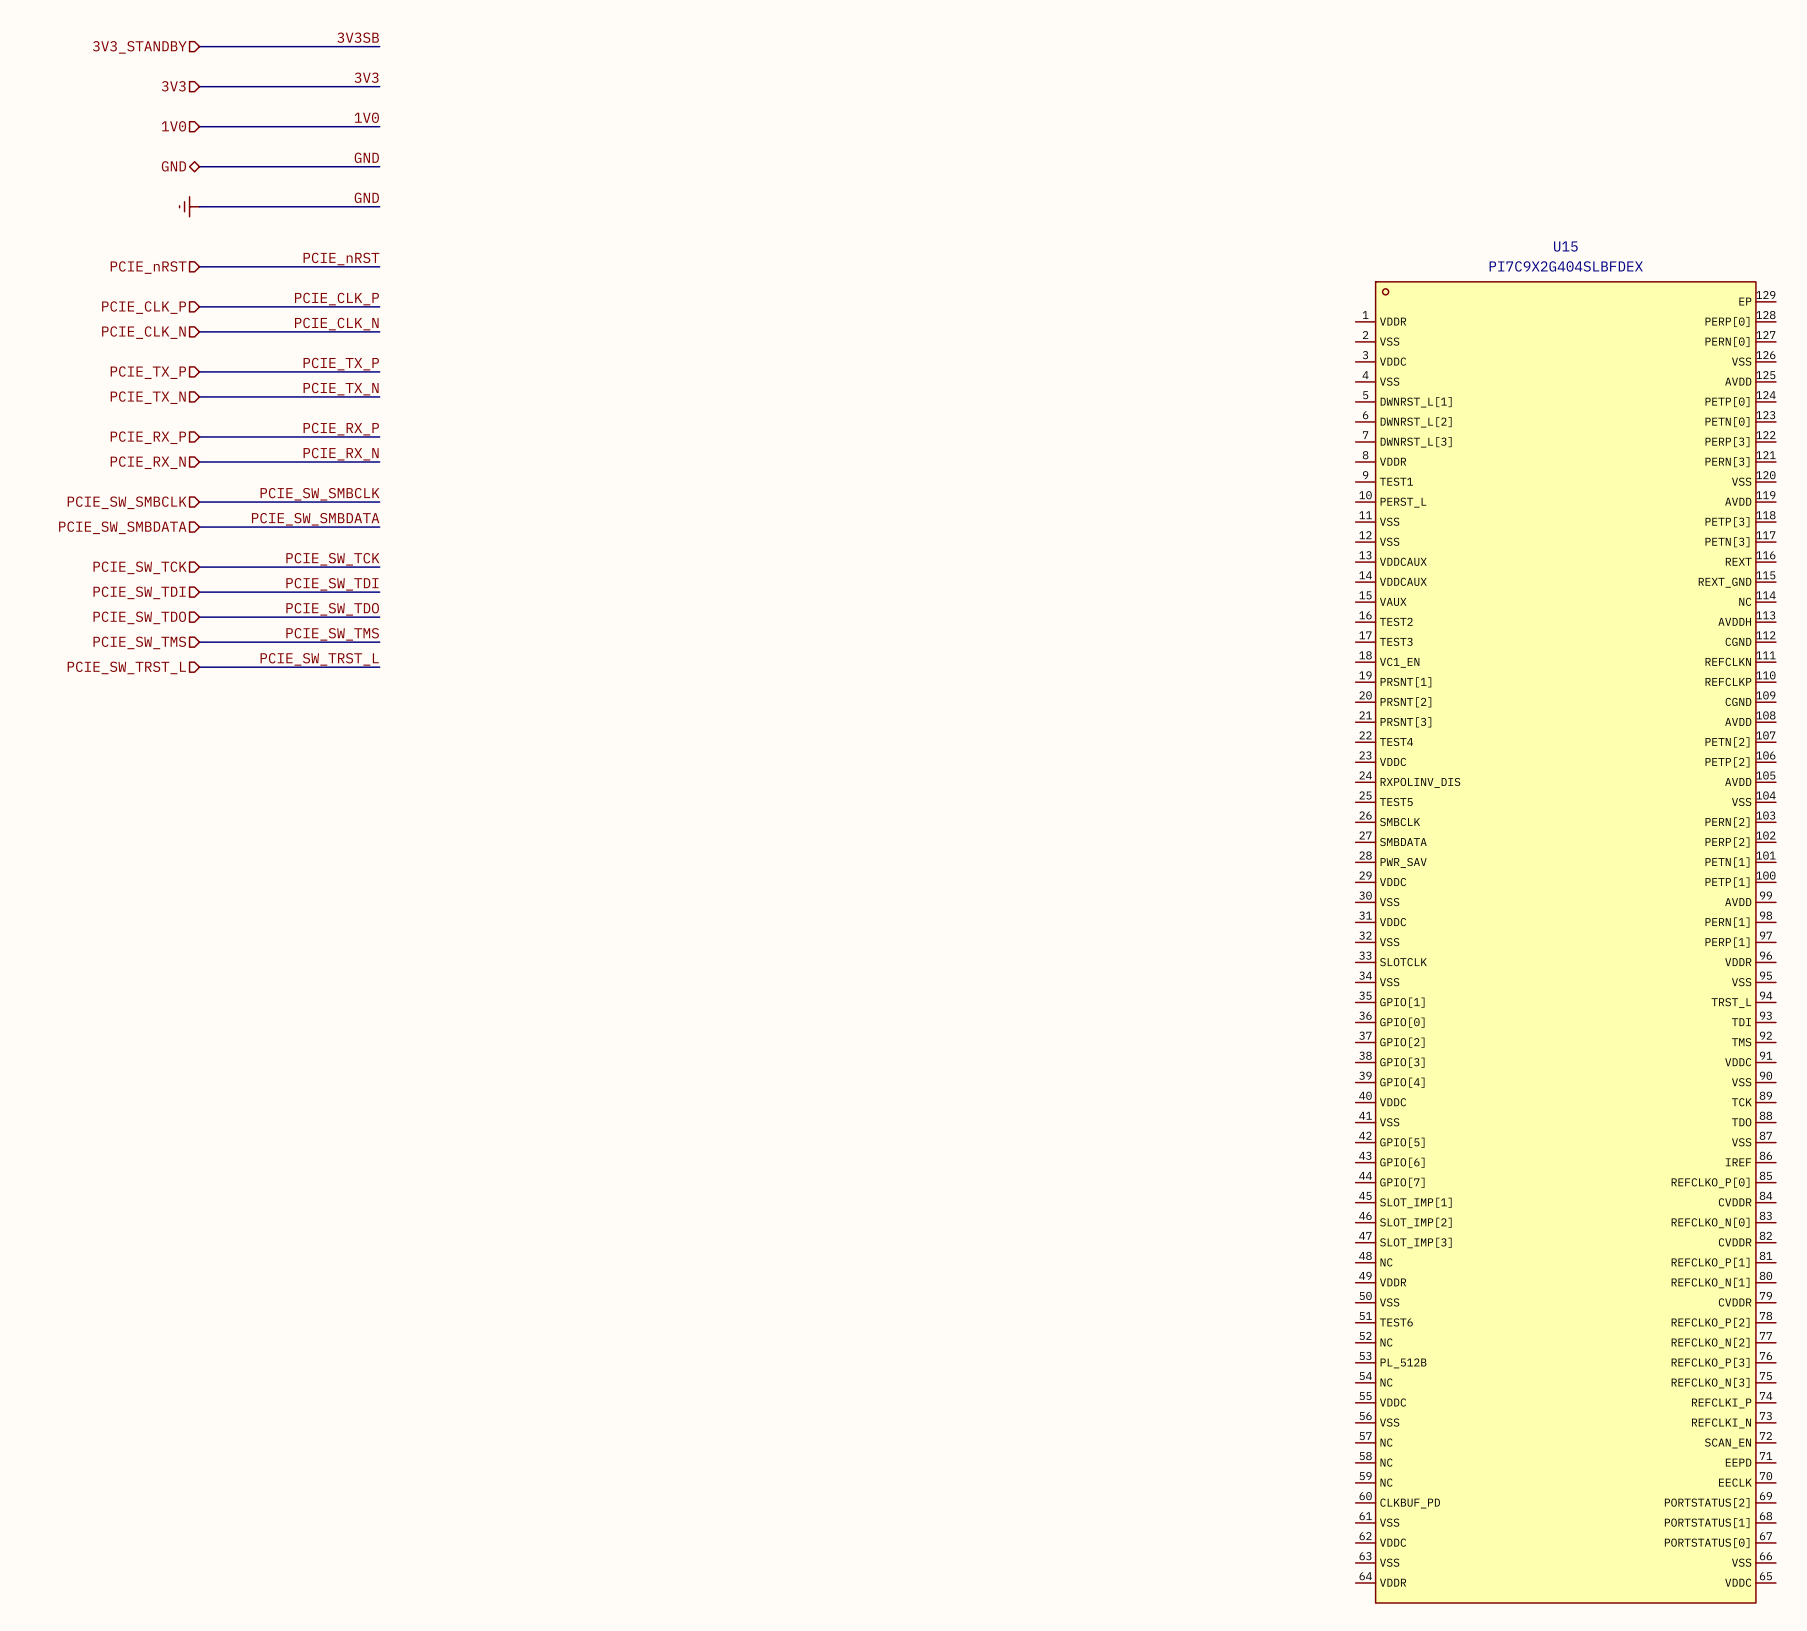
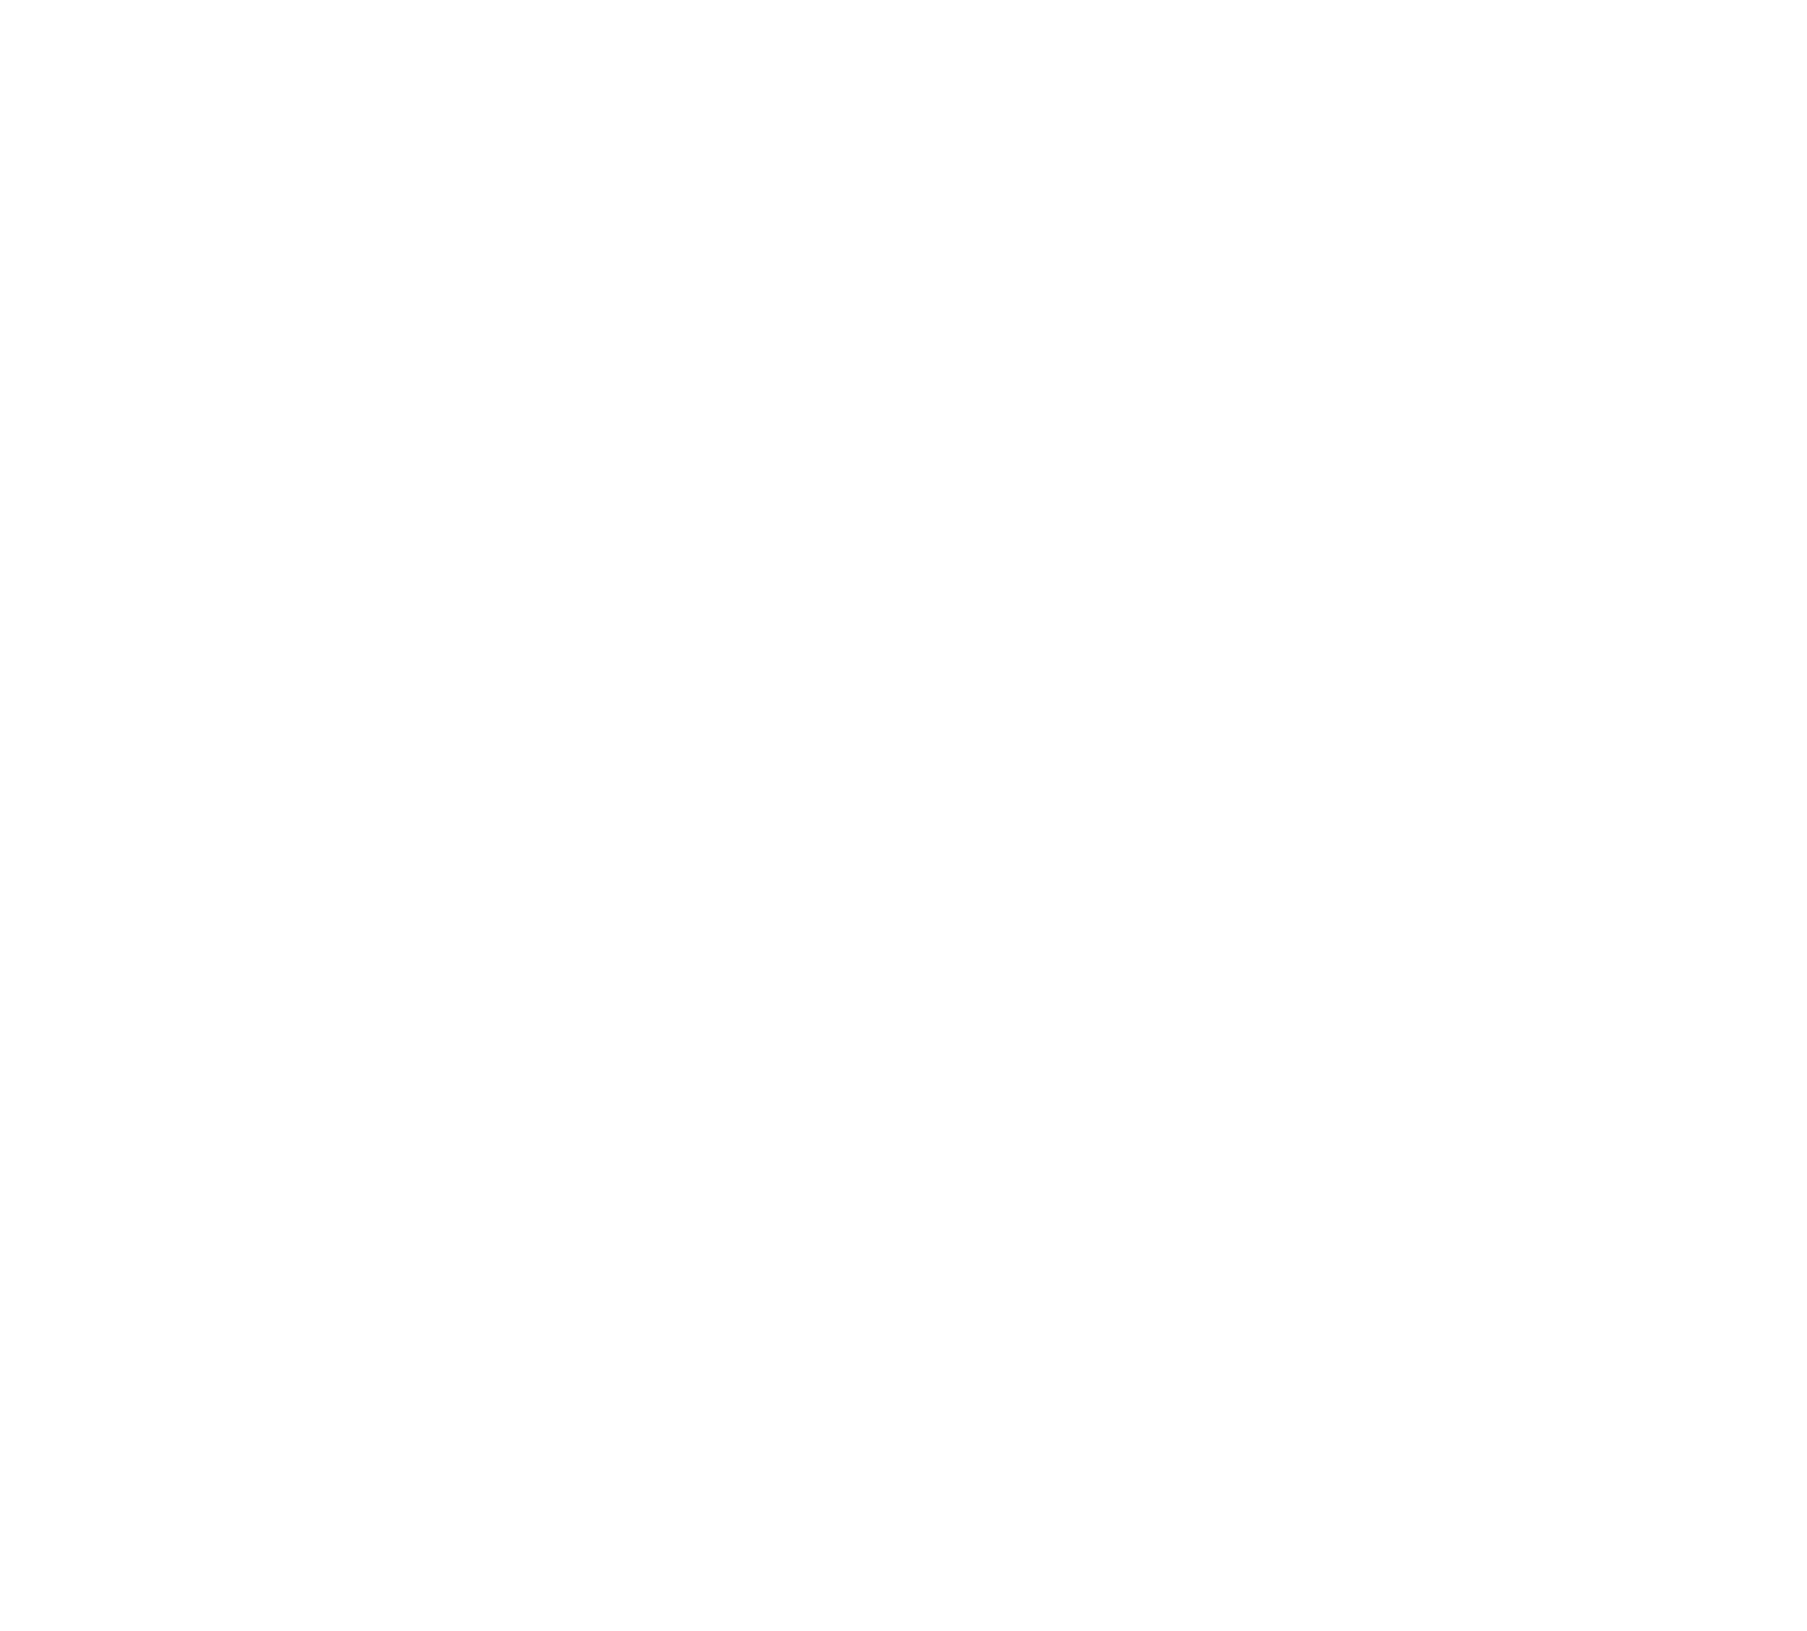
label: 3V3SB (358, 37) -> none
wire: (199, 46) (379, 46) -> none
hierarchical label: 3V3_STANDBY (139, 47) -> none
label: 3V3 (366, 77) -> none
hierarchical label: 3V3 (173, 86) -> none
wire: (199, 86) (379, 86) -> none
label: 1V0 (366, 117) -> none
hierarchical label: 1V0 (173, 126) -> none
wire: (199, 126) (379, 126) -> none
label: GND (366, 157) -> none
hierarchical label: GND (173, 166) -> none
wire: (199, 166) (379, 166) -> none
label: GND (366, 197) -> none
power symbol: (189, 206) -> none
wire: (199, 206) (379, 206) -> none
label: PCIE_nRST (341, 259) -> none
wire: (199, 266) (379, 266) -> none
hierarchical label: PCIE_nRST (148, 267) -> none
label: PCIE_CLK_P (336, 299) -> none
wire: (199, 306) (379, 306) -> none
hierarchical label: PCIE_CLK_P (144, 307) -> none
label: PCIE_CLK_N (336, 324) -> none
wire: (199, 331) (379, 331) -> none
hierarchical label: PCIE_CLK_N (143, 332) -> none
label: PCIE_TX_P (341, 364) -> none
wire: (199, 371) (379, 371) -> none
hierarchical label: PCIE_TX_P (148, 372) -> none
label: PCIE_TX_N (341, 389) -> none
wire: (199, 396) (379, 396) -> none
hierarchical label: PCIE_TX_N (148, 397) -> none
label: PCIE_RX_P (341, 429) -> none
wire: (199, 436) (379, 436) -> none
hierarchical label: PCIE_RX_P (148, 437) -> none
label: PCIE_RX_N (341, 454) -> none
hierarchical label: PCIE_RX_N (148, 462) -> none
wire: (199, 462) (379, 462) -> none
label: PCIE_SW_SMBCLK (319, 494) -> none
hierarchical label: PCIE_SW_SMBCLK (127, 502) -> none
wire: (199, 502) (379, 502) -> none
label: PCIE_SW_SMBDATA (315, 519) -> none
hierarchical label: PCIE_SW_SMBDATA (122, 527) -> none
wire: (199, 527) (379, 527) -> none
label: PCIE_SW_TCK (332, 559) -> none
hierarchical label: PCIE_SW_TCK (140, 567) -> none
wire: (199, 567) (379, 567) -> none
label: PCIE_SW_TDI (332, 584) -> none
hierarchical label: PCIE_SW_TDI (139, 592) -> none
wire: (199, 592) (379, 592) -> none
label: PCIE_SW_TDO (332, 609) -> none
hierarchical label: PCIE_SW_TDO (139, 617) -> none
wire: (199, 617) (379, 617) -> none
label: PCIE_SW_TMS (332, 634) -> none
hierarchical label: PCIE_SW_TMS (139, 642) -> none
wire: (199, 642) (379, 642) -> none
label: PCIE_SW_TRST_L (319, 659) -> none
hierarchical label: PCIE_SW_TRST_L (126, 667) -> none
wire: (199, 667) (379, 667) -> none
U15: PI7C9X2G404SLBFDEX (1565, 942) -> none

